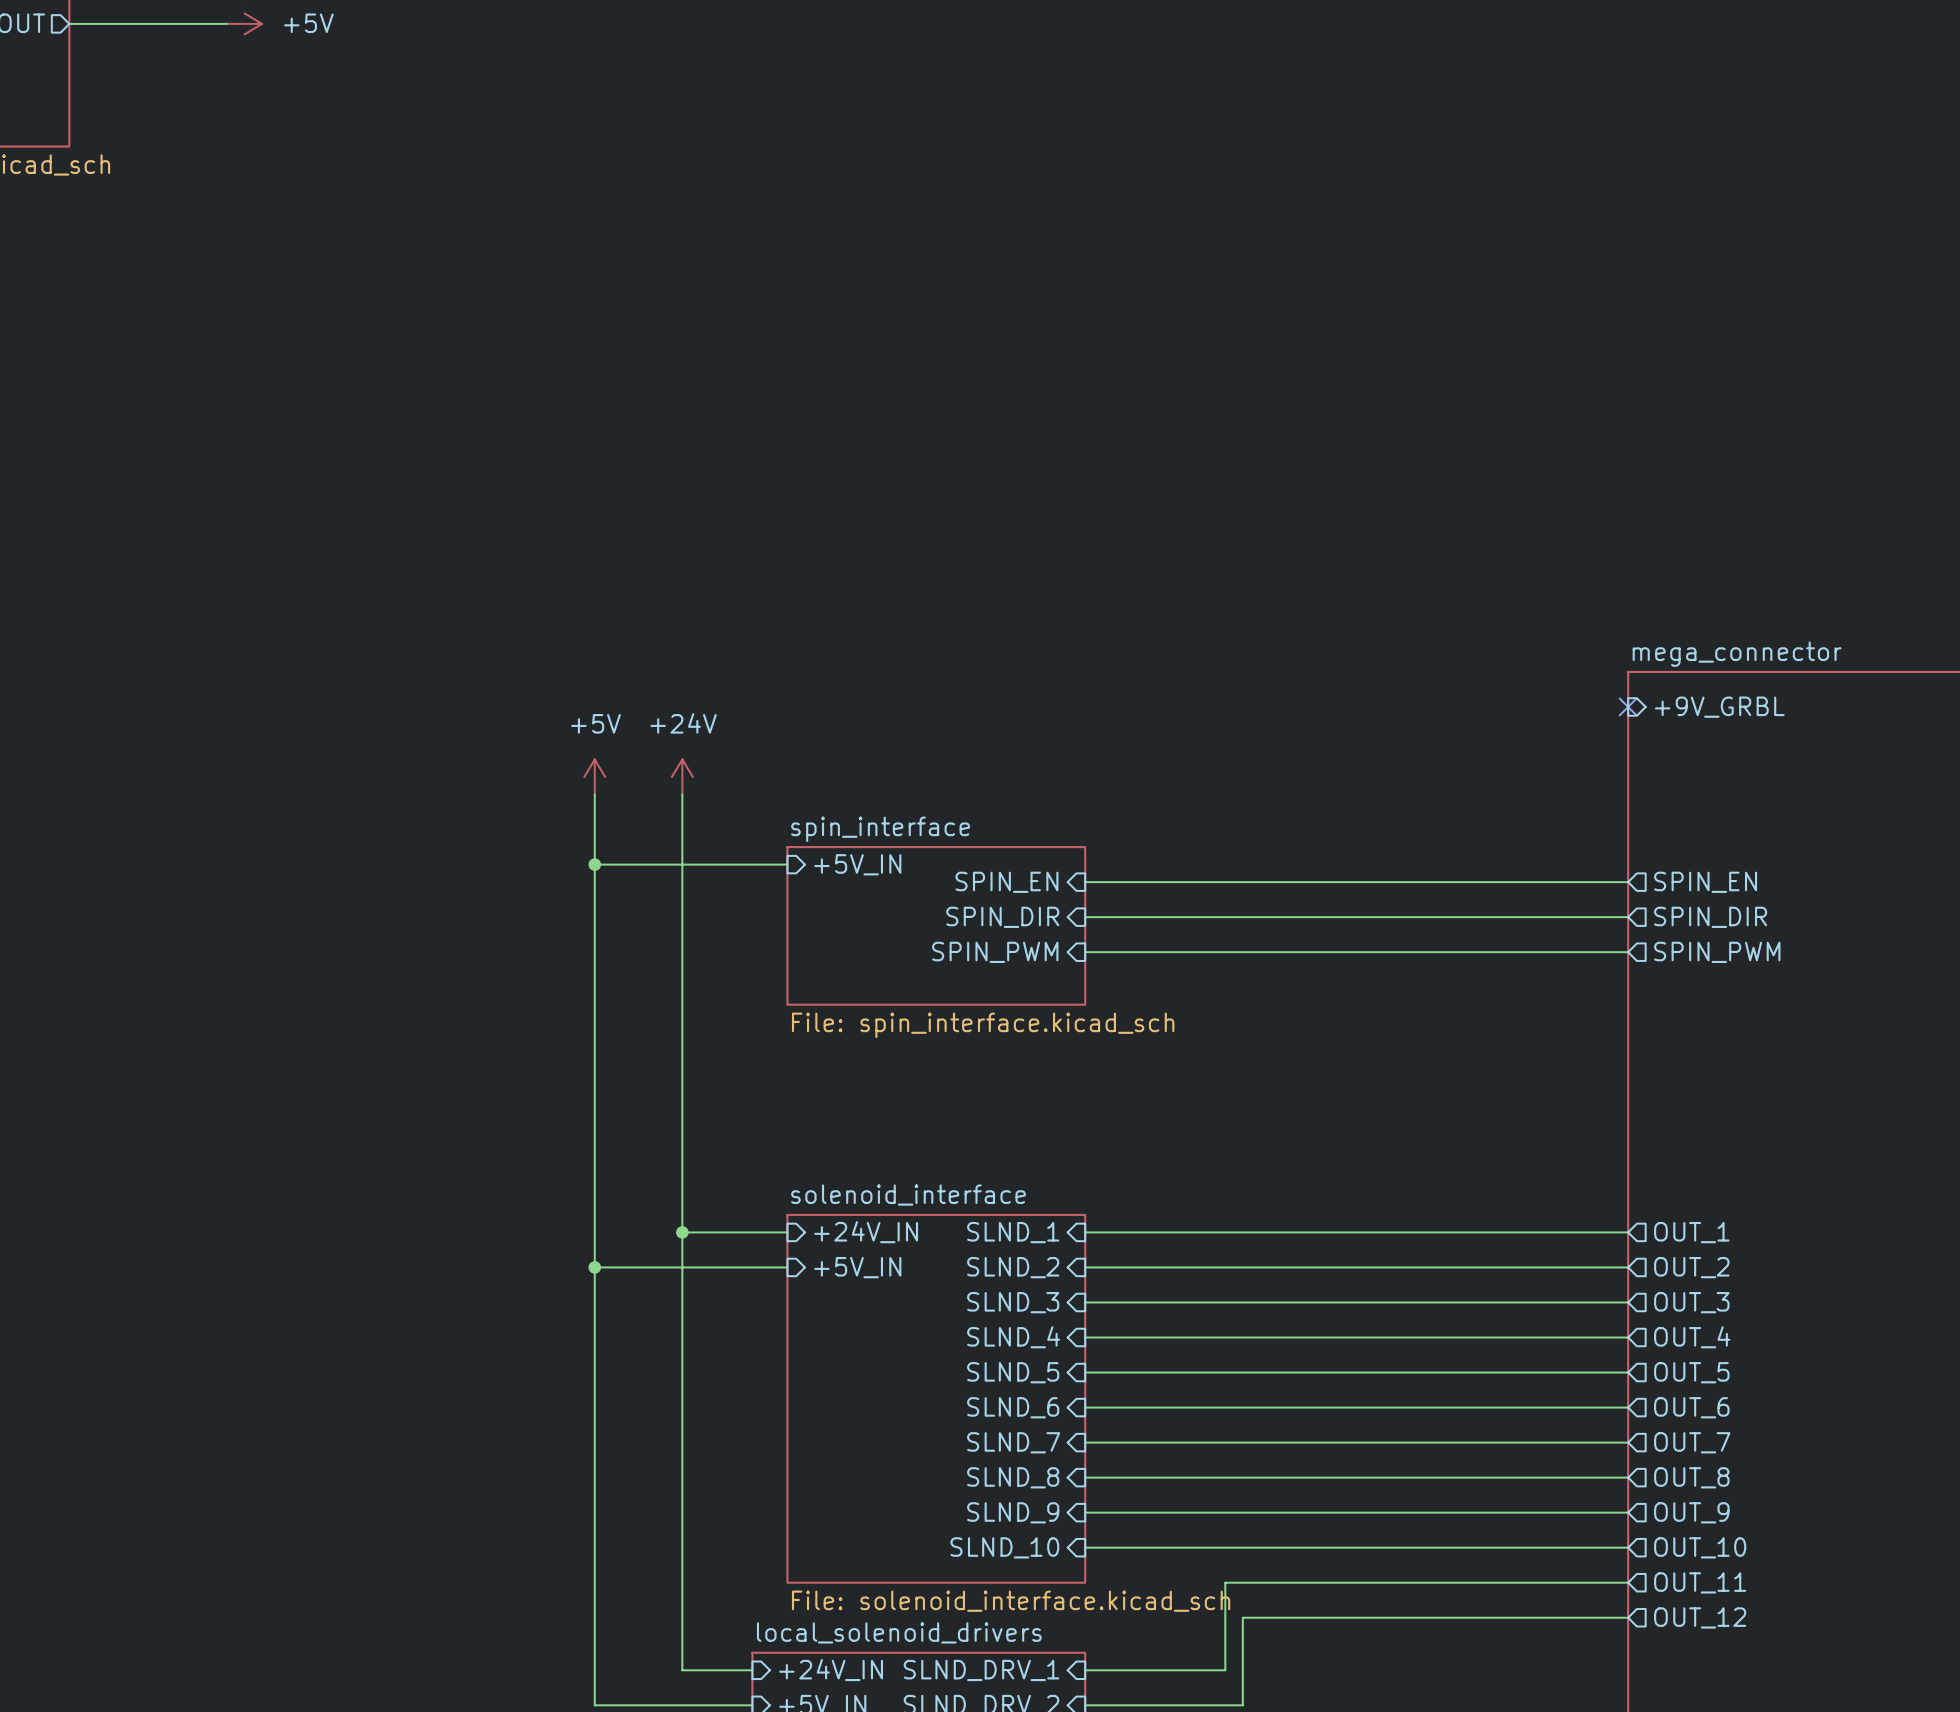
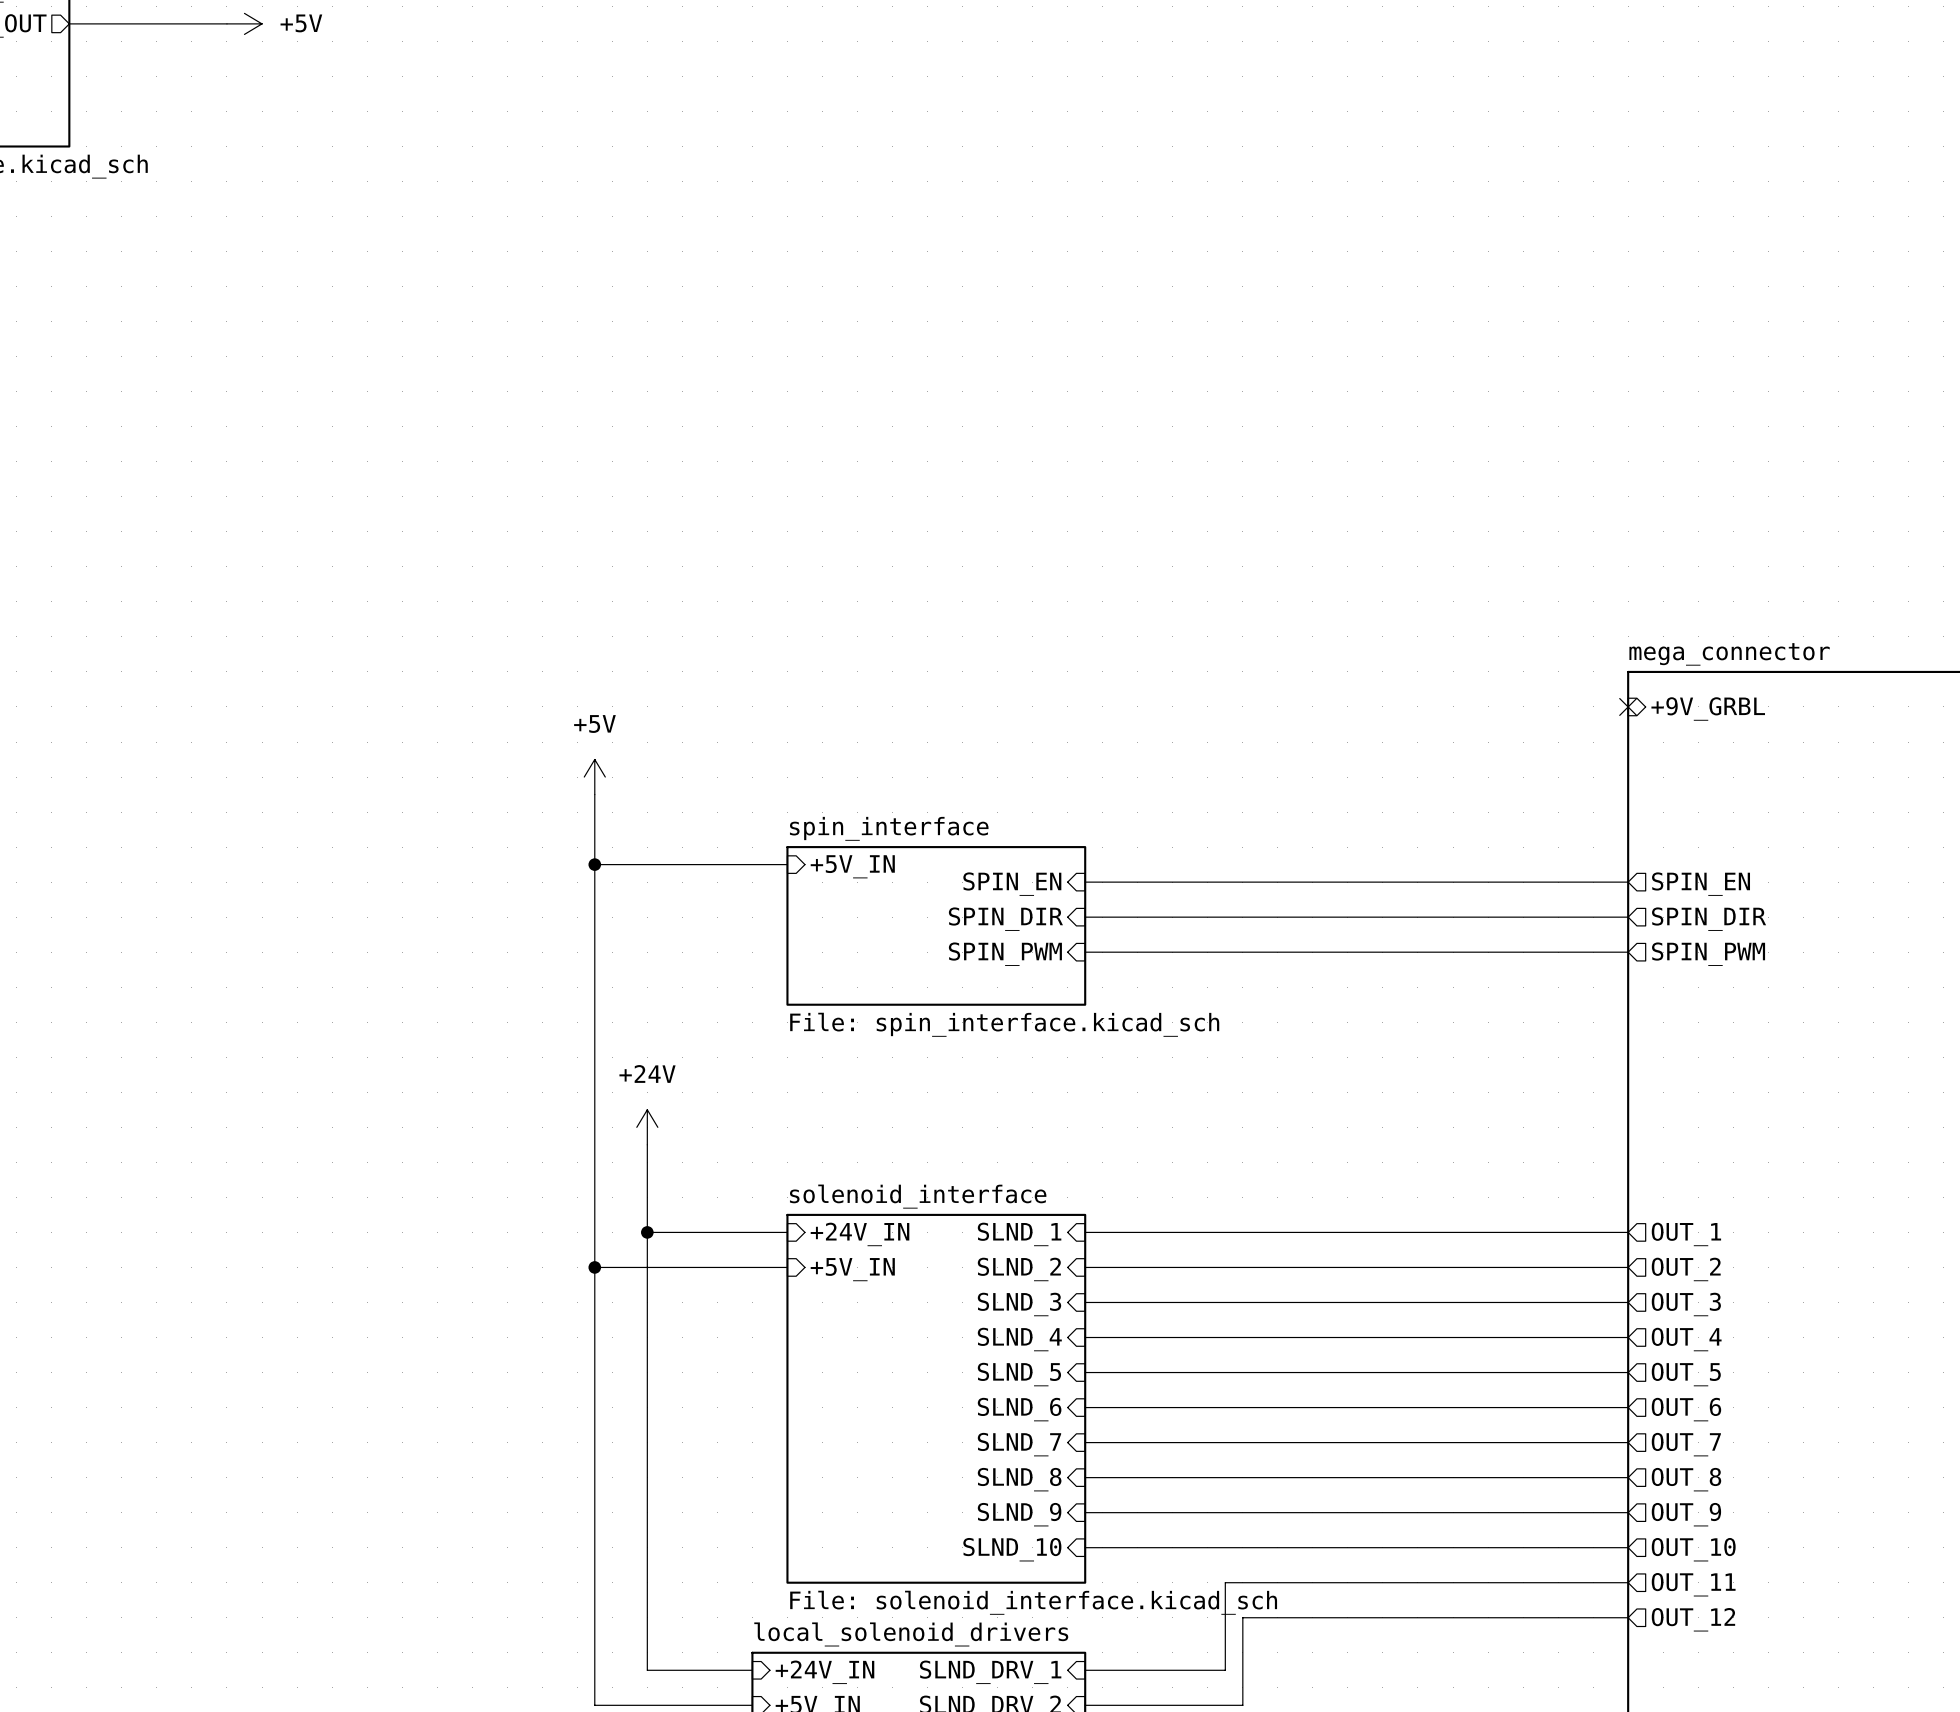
power symbol: +24V (682, 777) -> none
wire: (682, 794) (682, 1670) -> (647, 1144) (647, 1670) (682, 1670)
power symbol: none -> +24V (647, 1127)
wire: none -> (647, 1232) (682, 1232)
junction position: (682, 1232) -> (647, 1232)

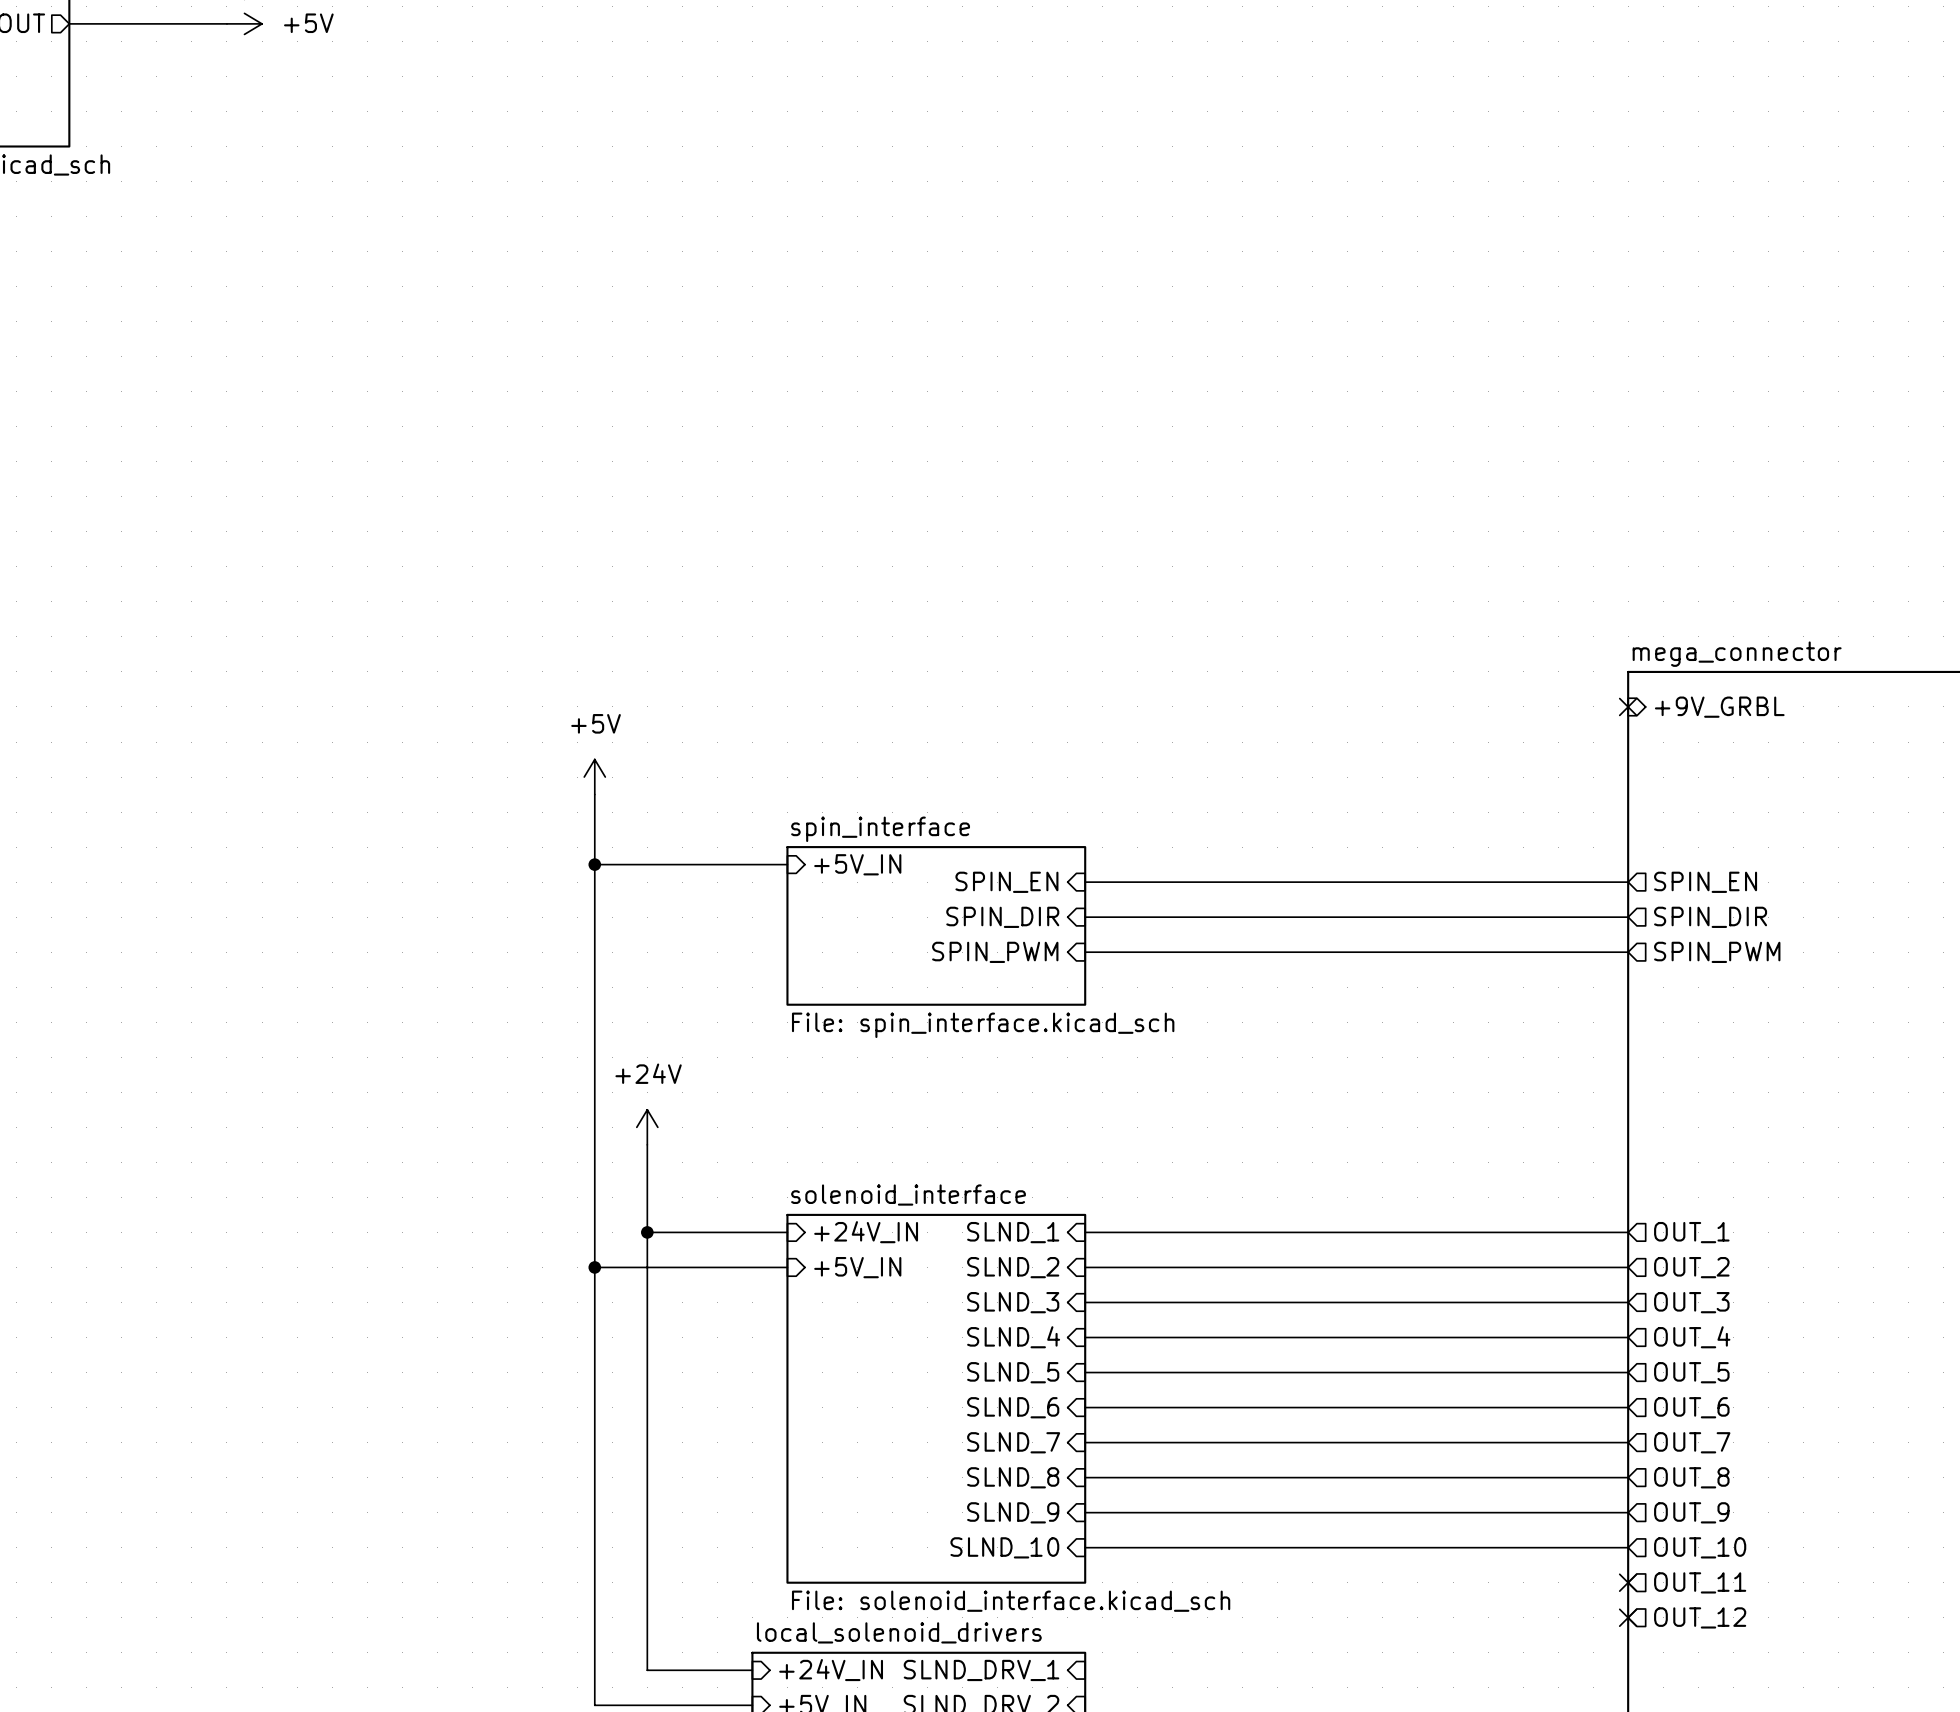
wire: (1628, 1582) (1225, 1582) (1225, 1670) (1085, 1670) -> none
no-connect mark: none -> (1628, 1582)
wire: (1628, 1617) (1242, 1617) (1242, 1705) (1085, 1705) -> none
no-connect mark: none -> (1628, 1617)

